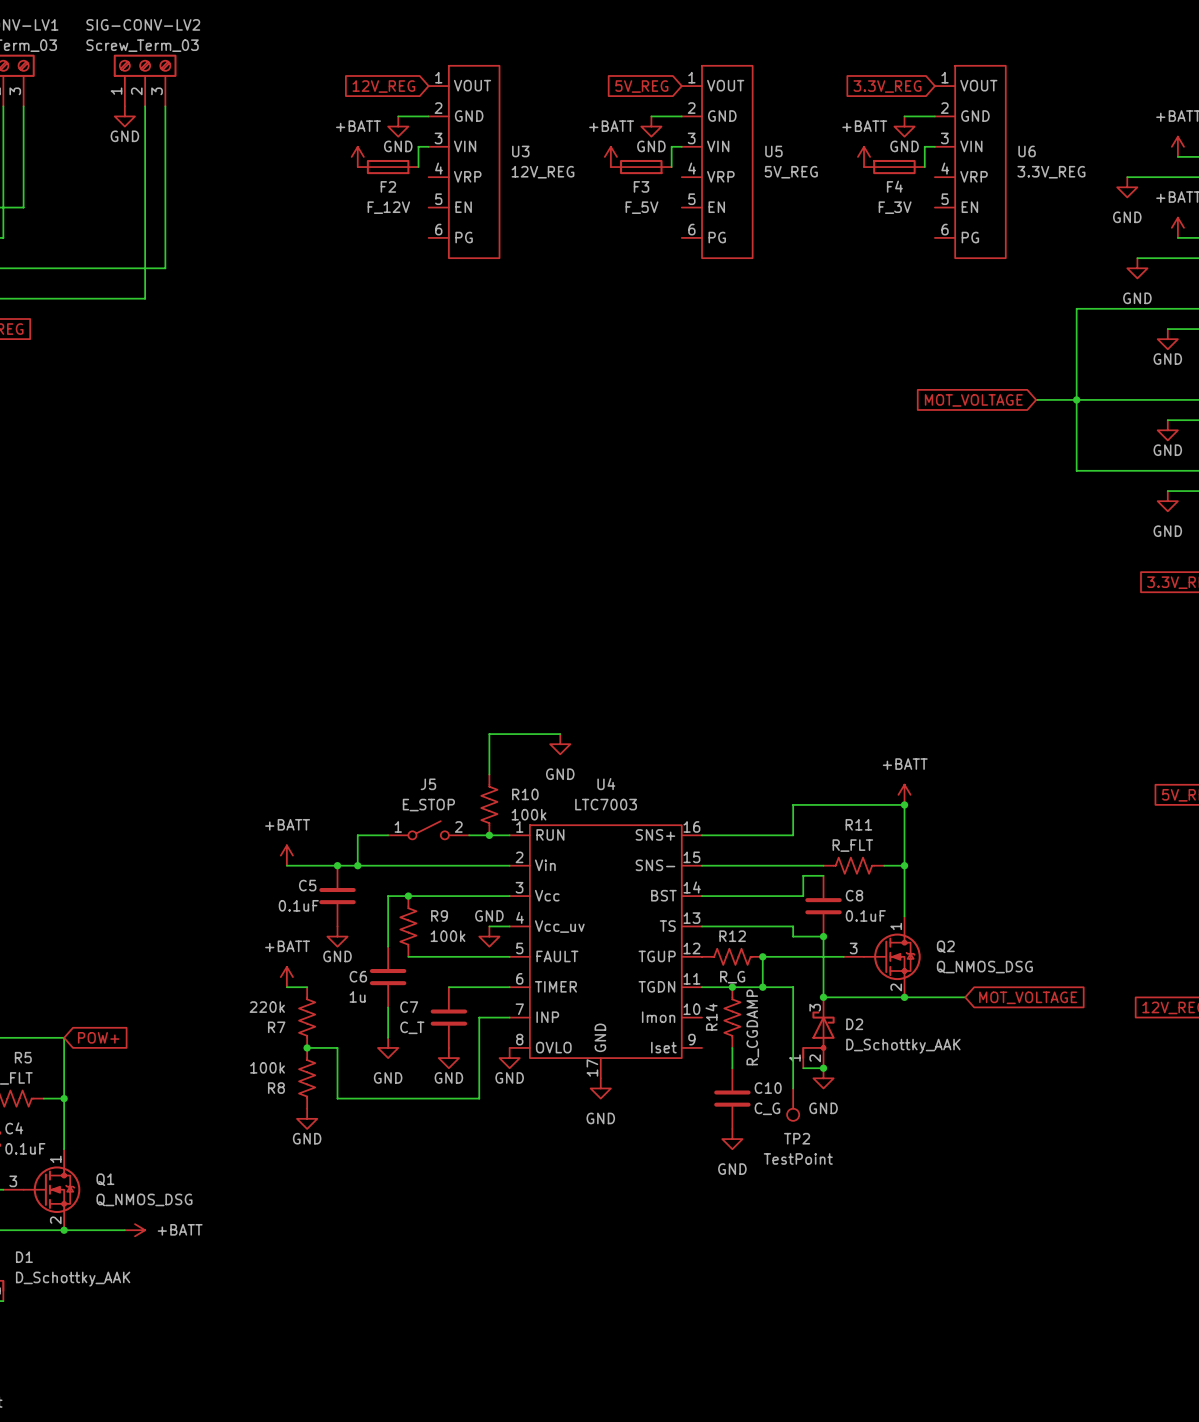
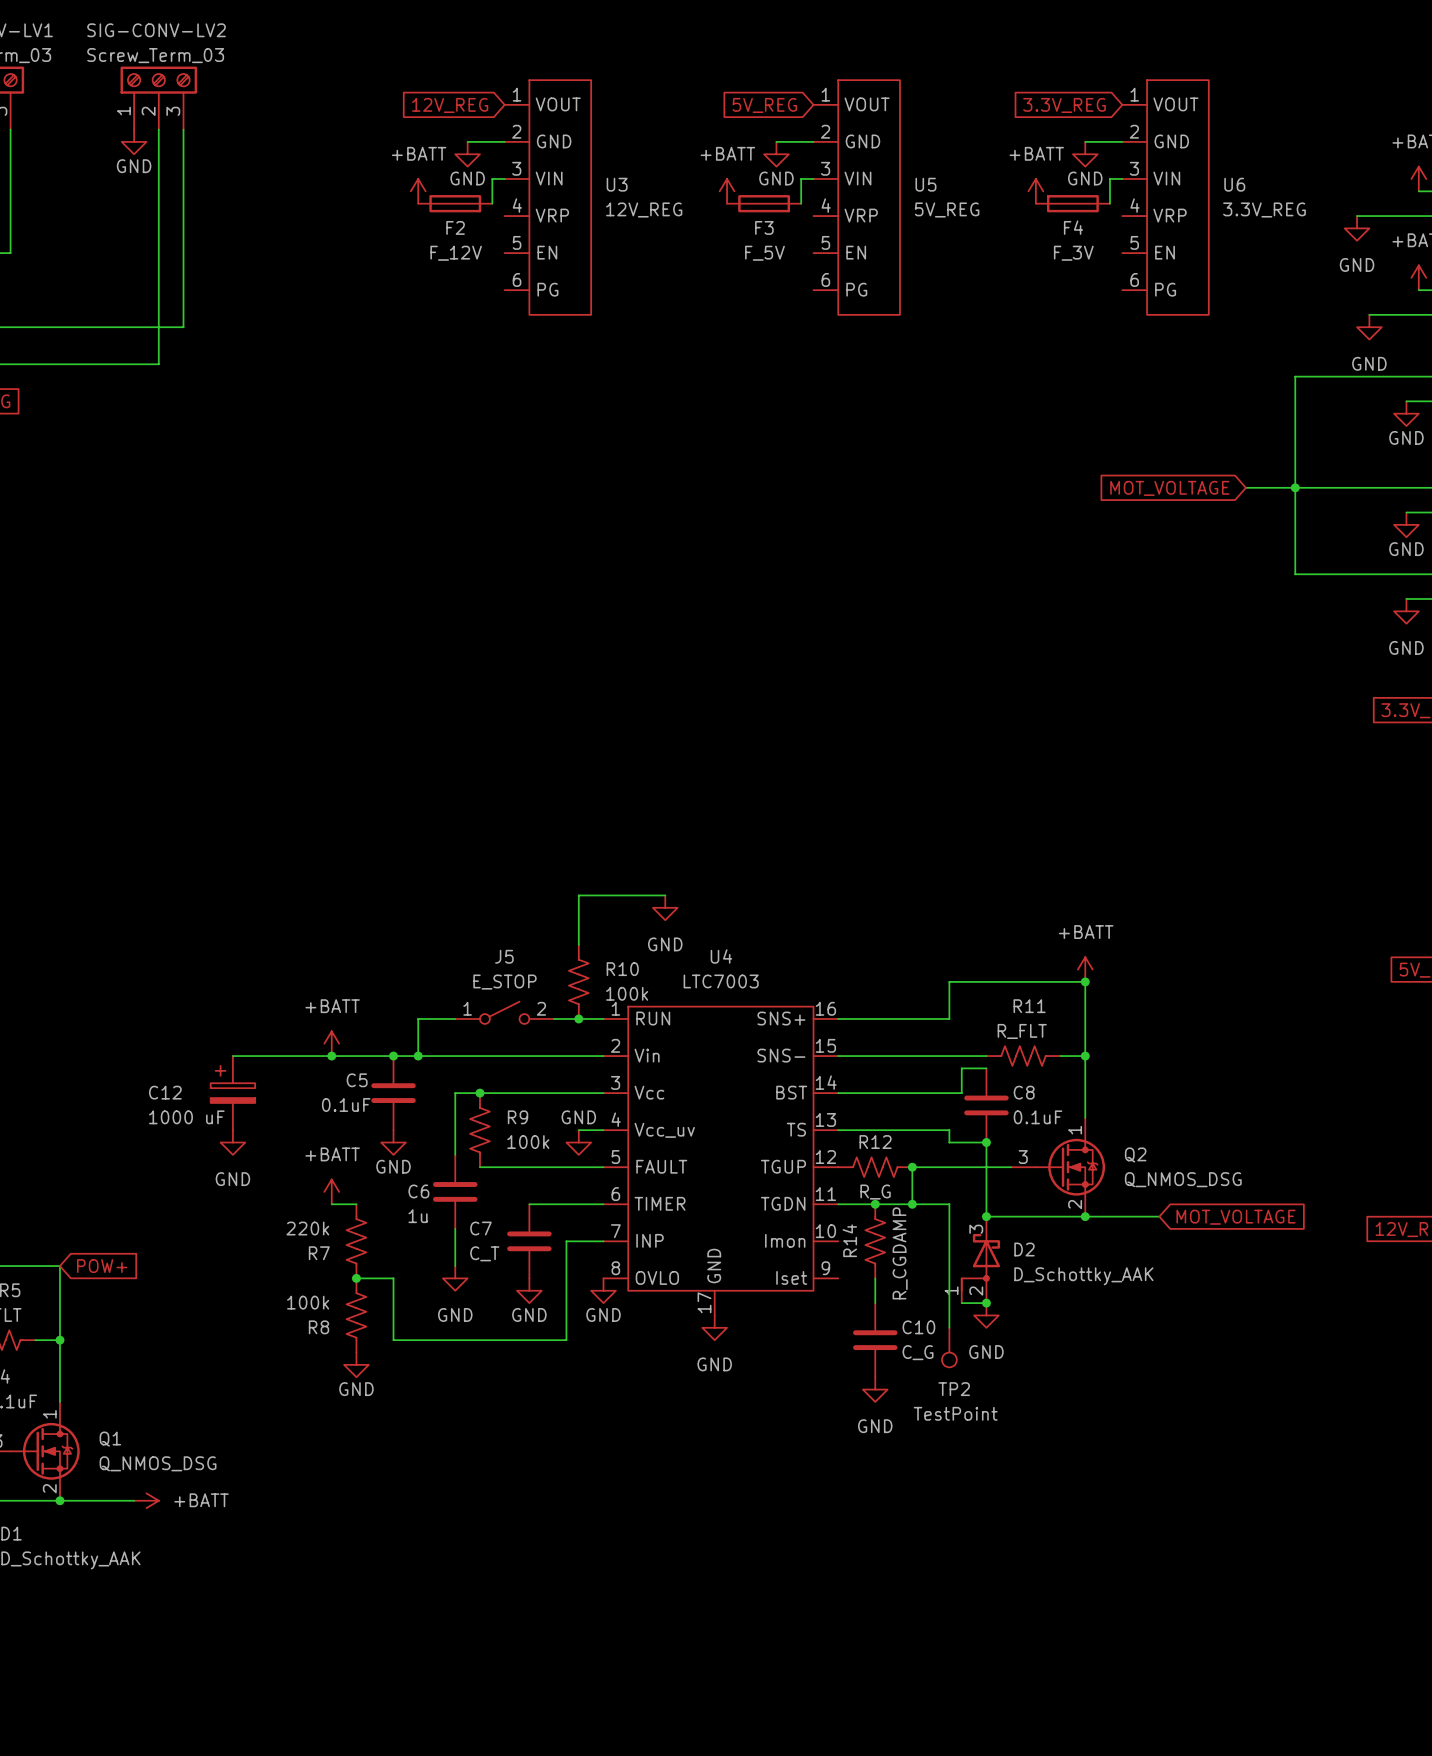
wire: none -> (232, 1056) (331, 1056)
junction: none -> (331, 1056)
C12: none -> 1000 uF (232, 1093)
power symbol: none -> GND (232, 1142)

